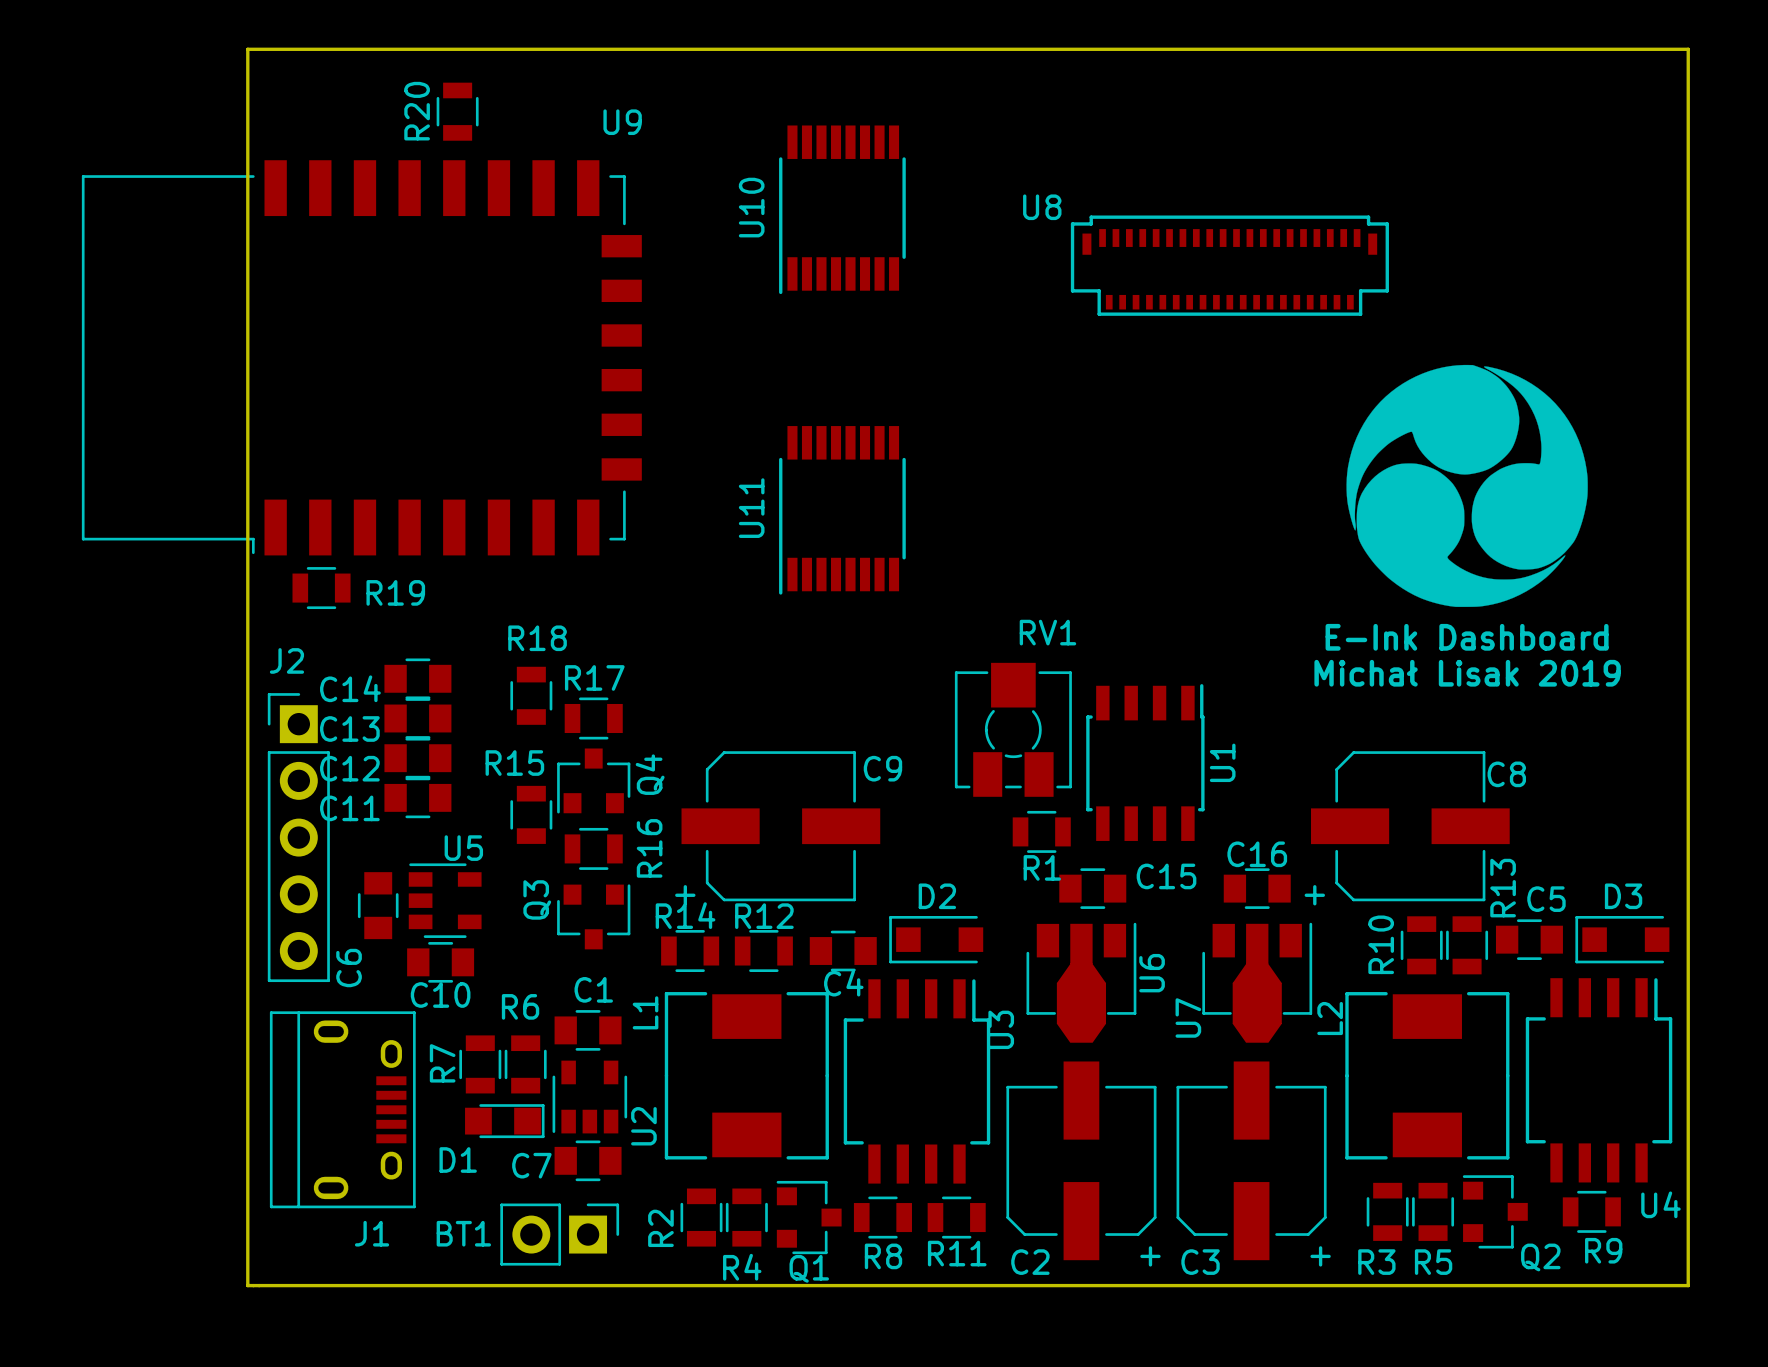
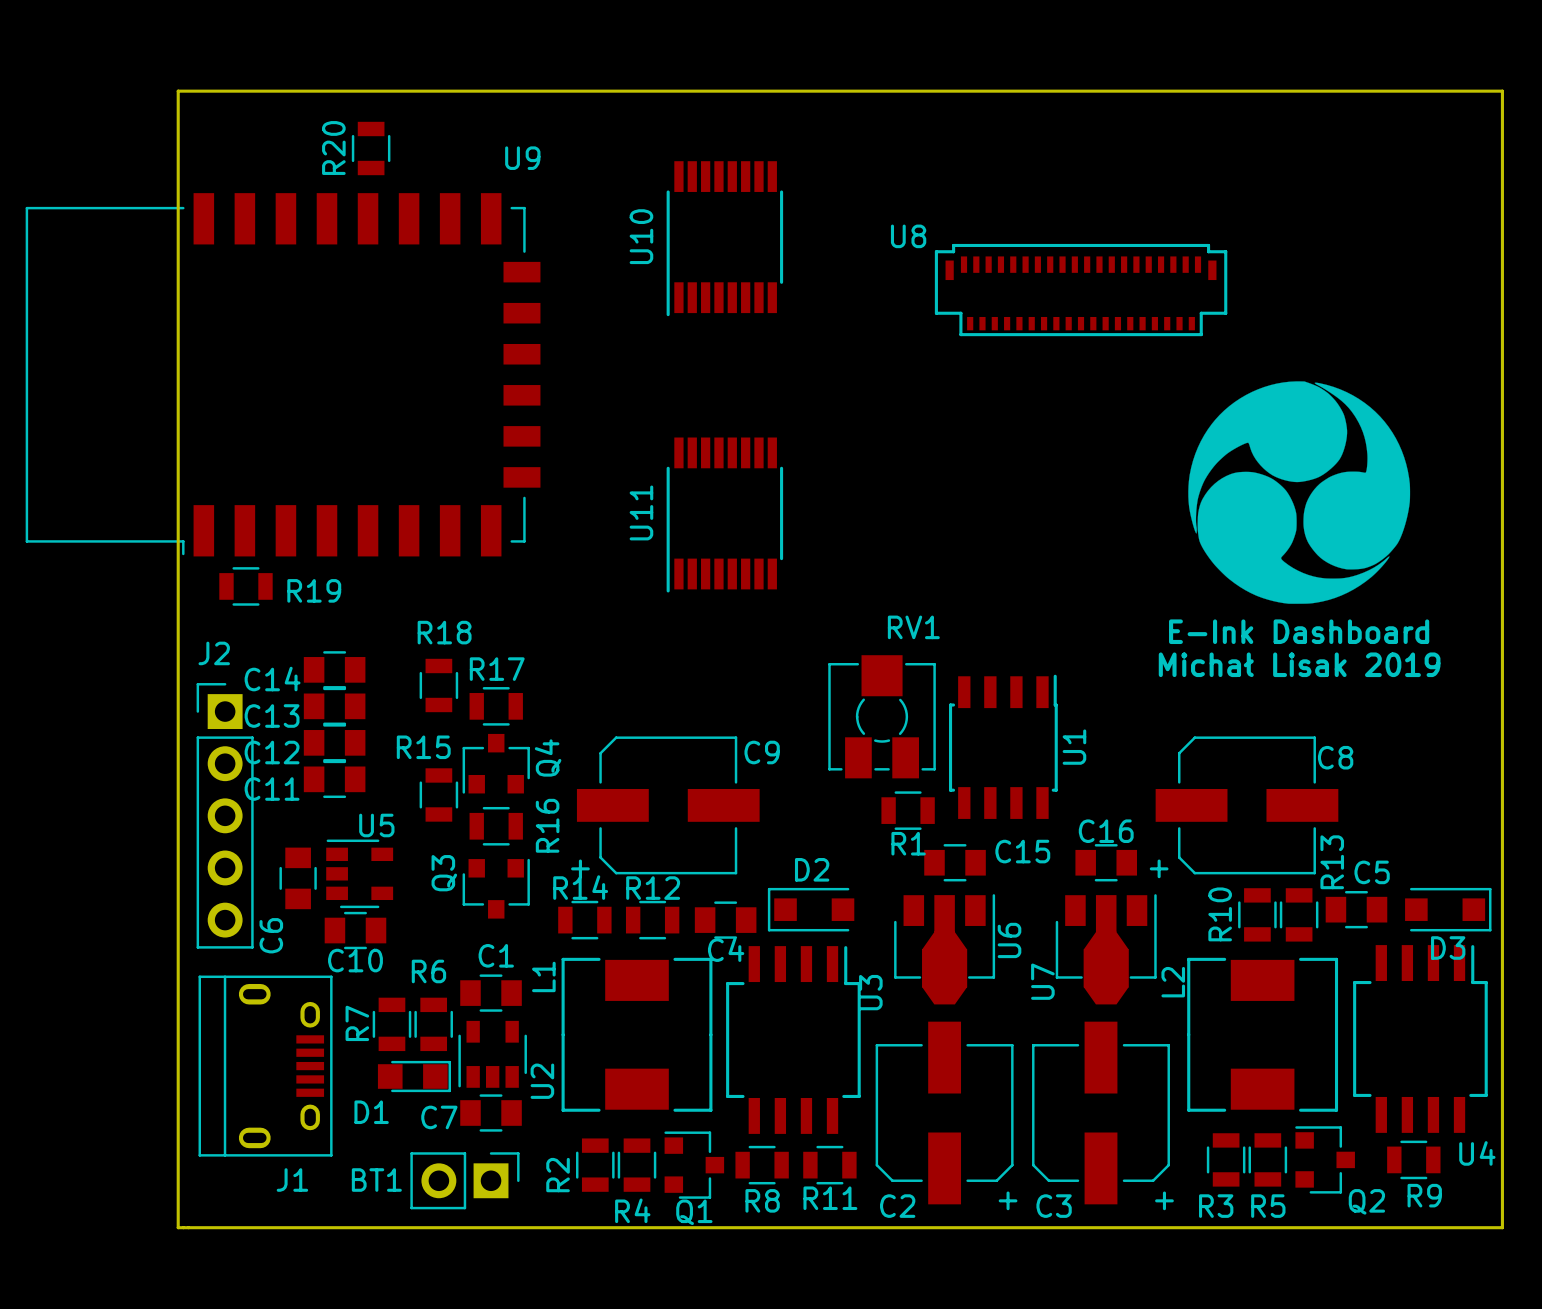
D3 rotation: 0° (1622, 939) -> 180° (1448, 909)

